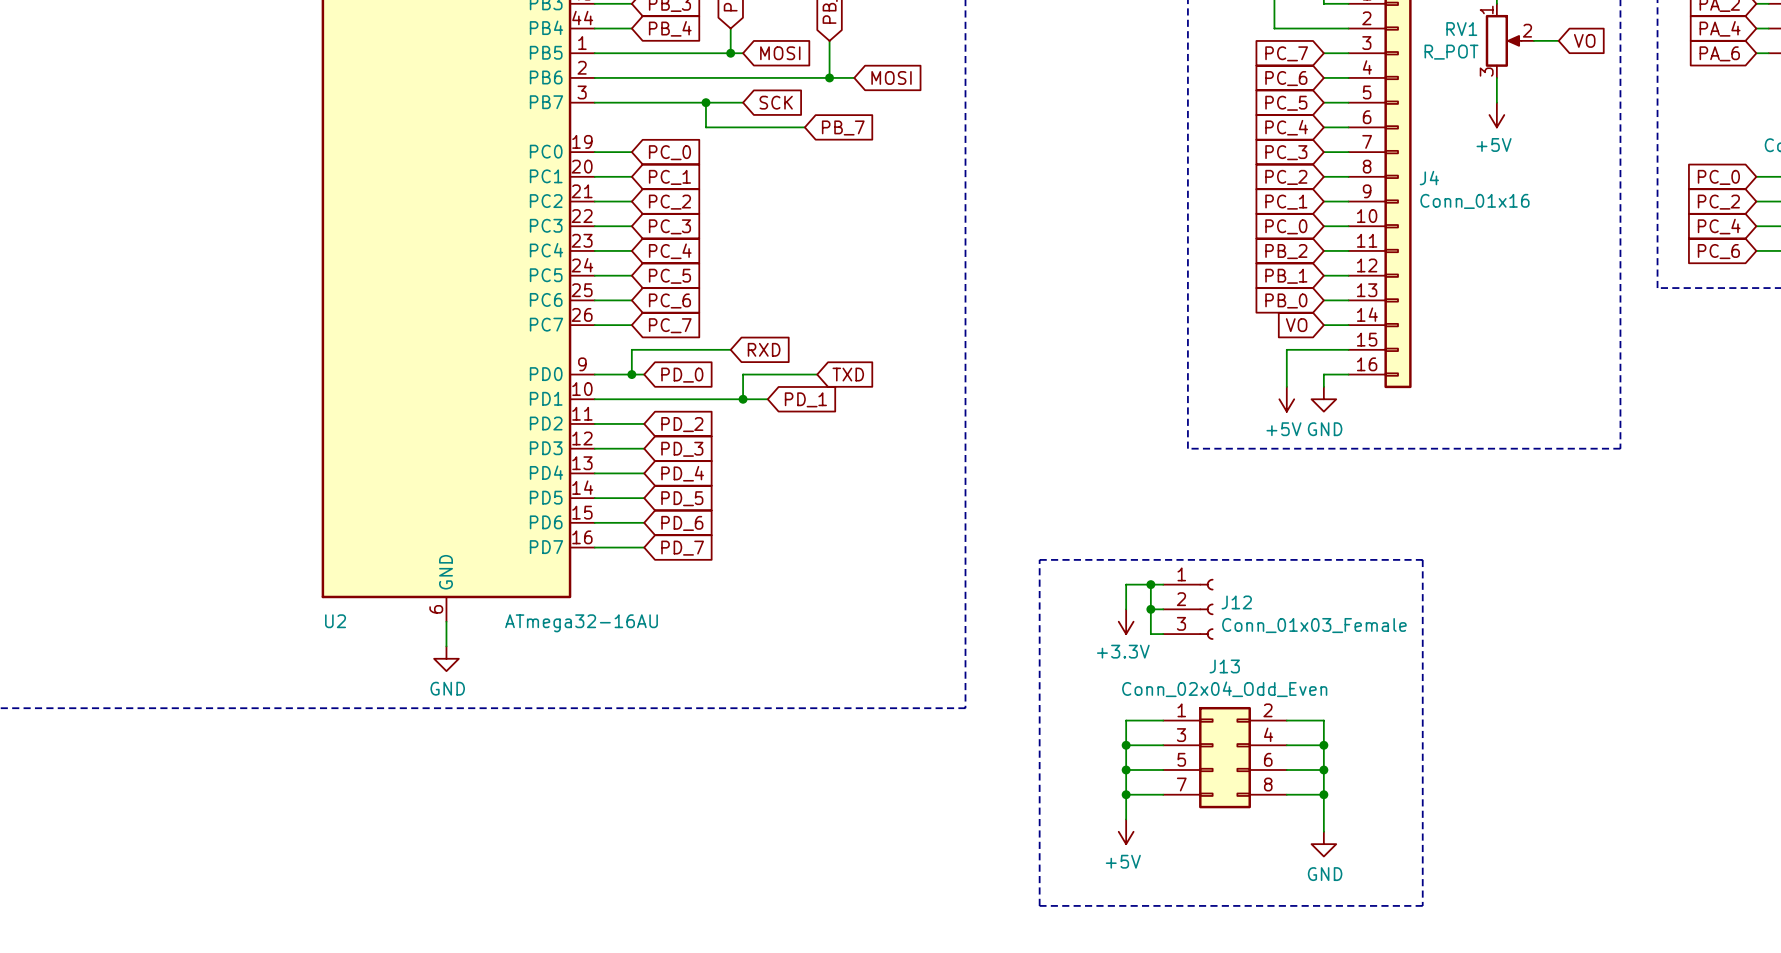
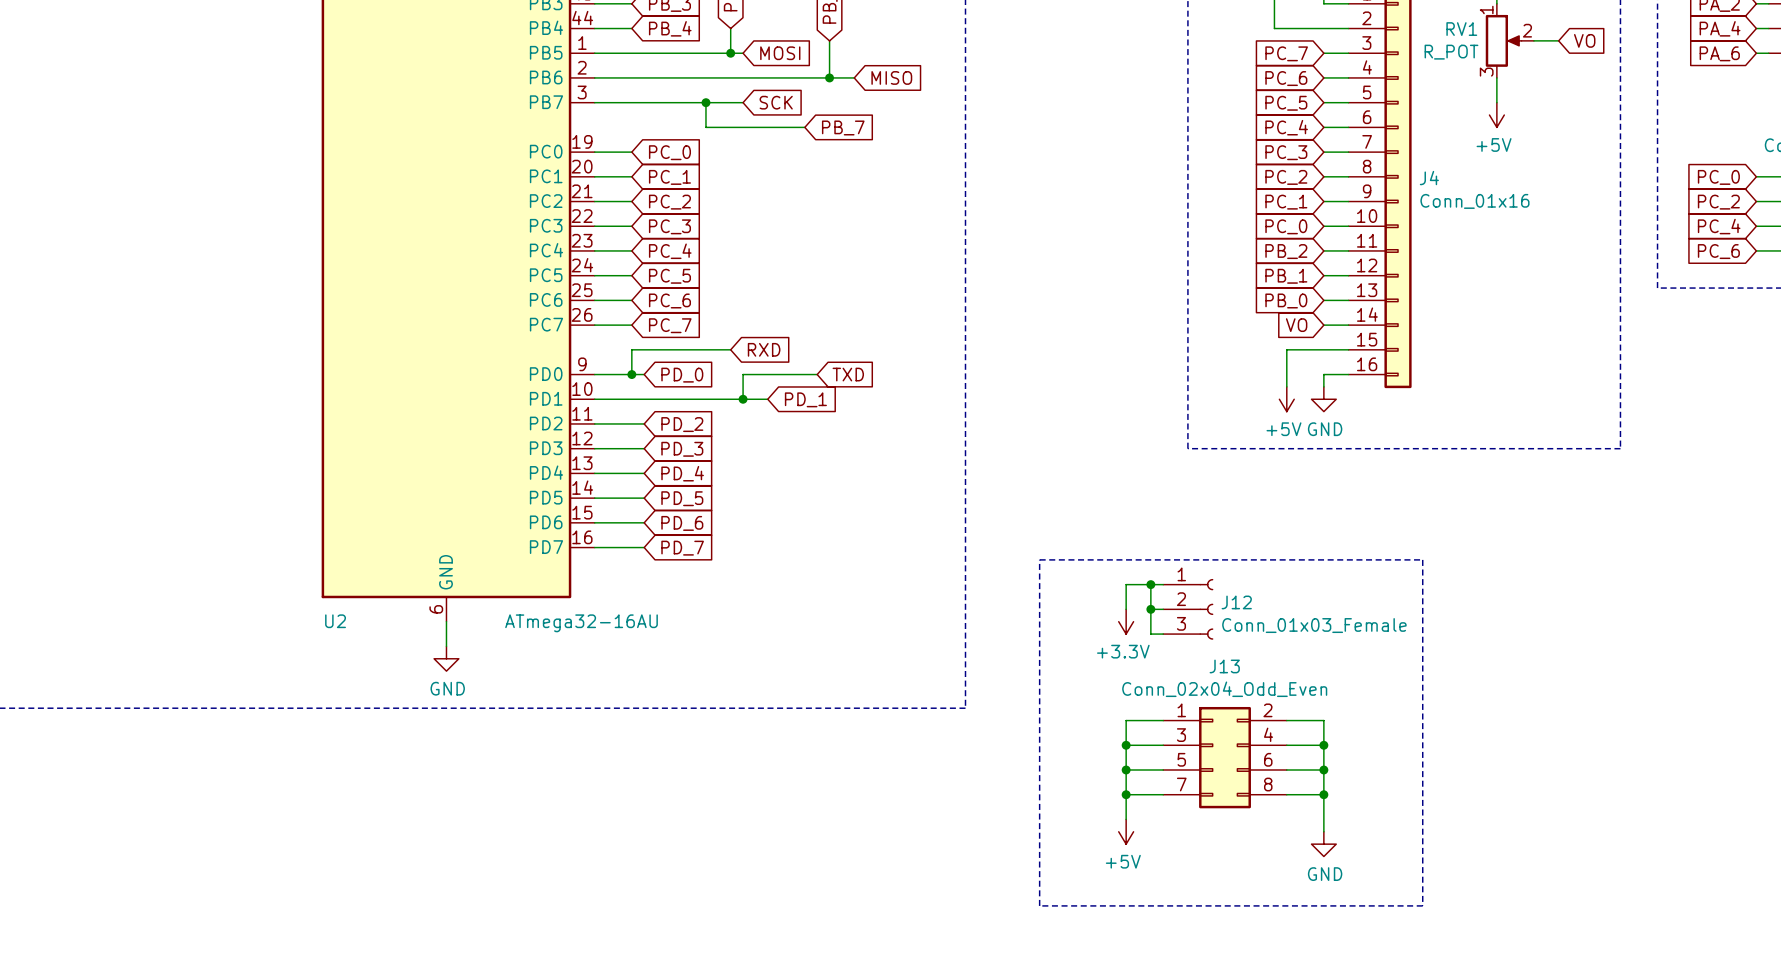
global label: MOSI (891, 77) -> MISO (891, 77)

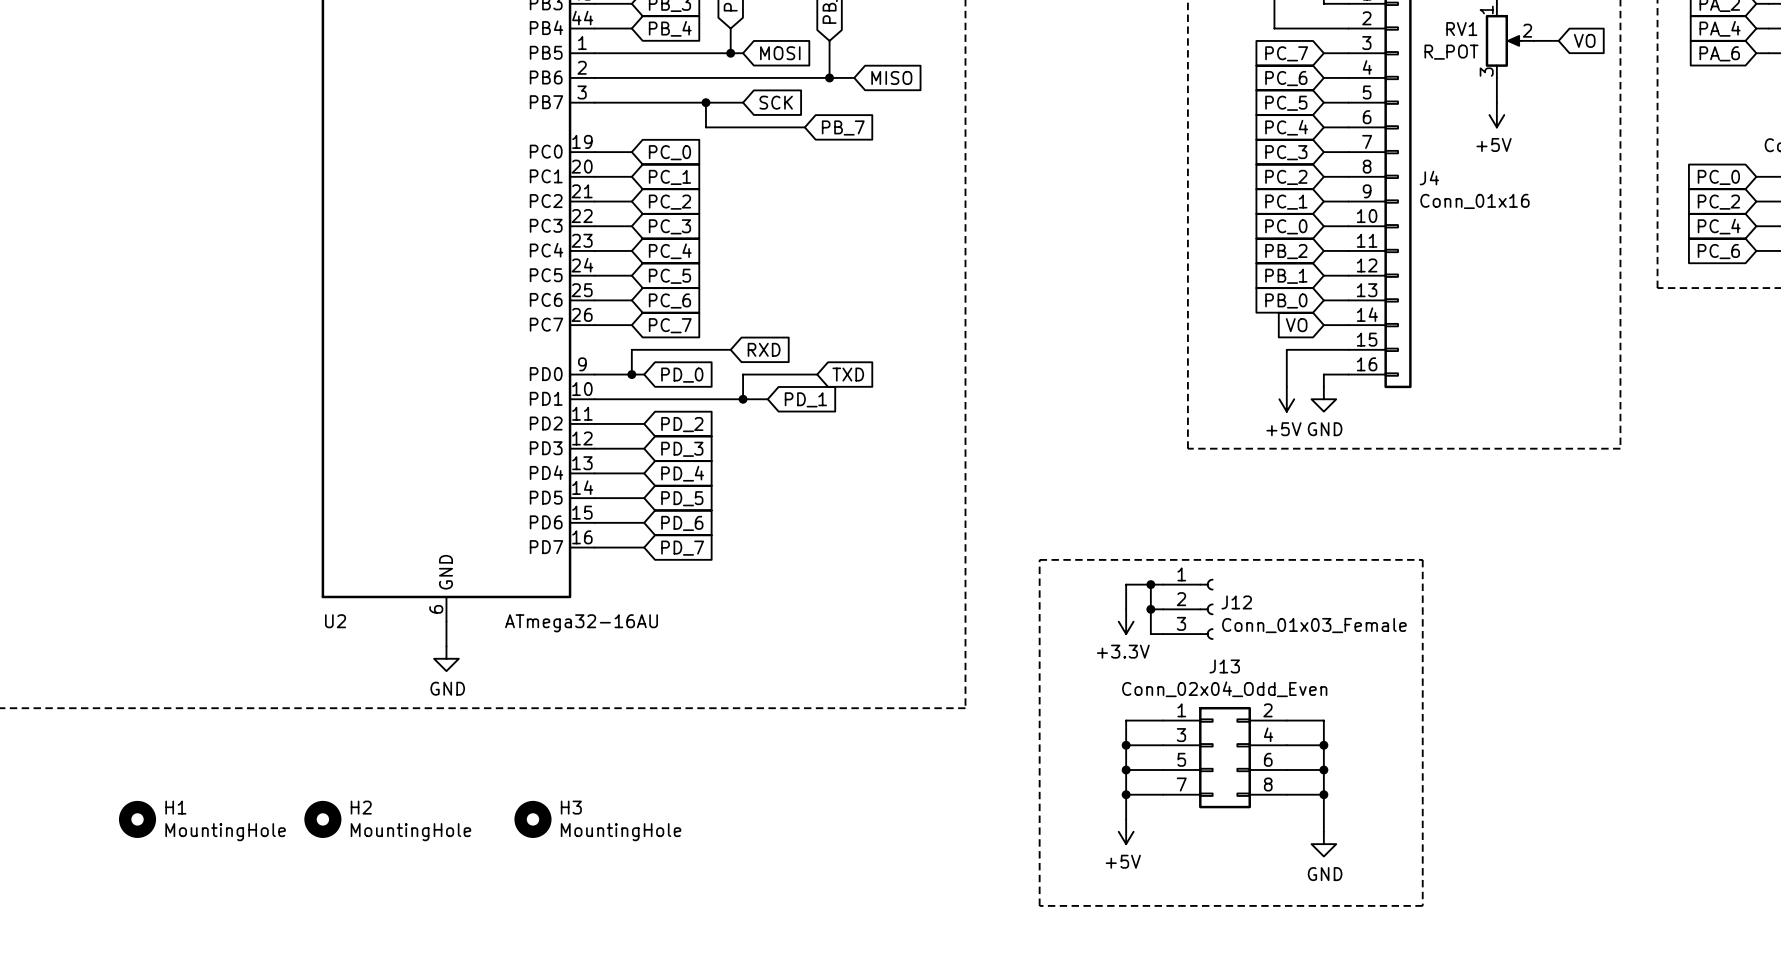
H1: none -> MountingHole (137, 819)
H2: none -> MountingHole (322, 819)
H3: none -> MountingHole (532, 819)

